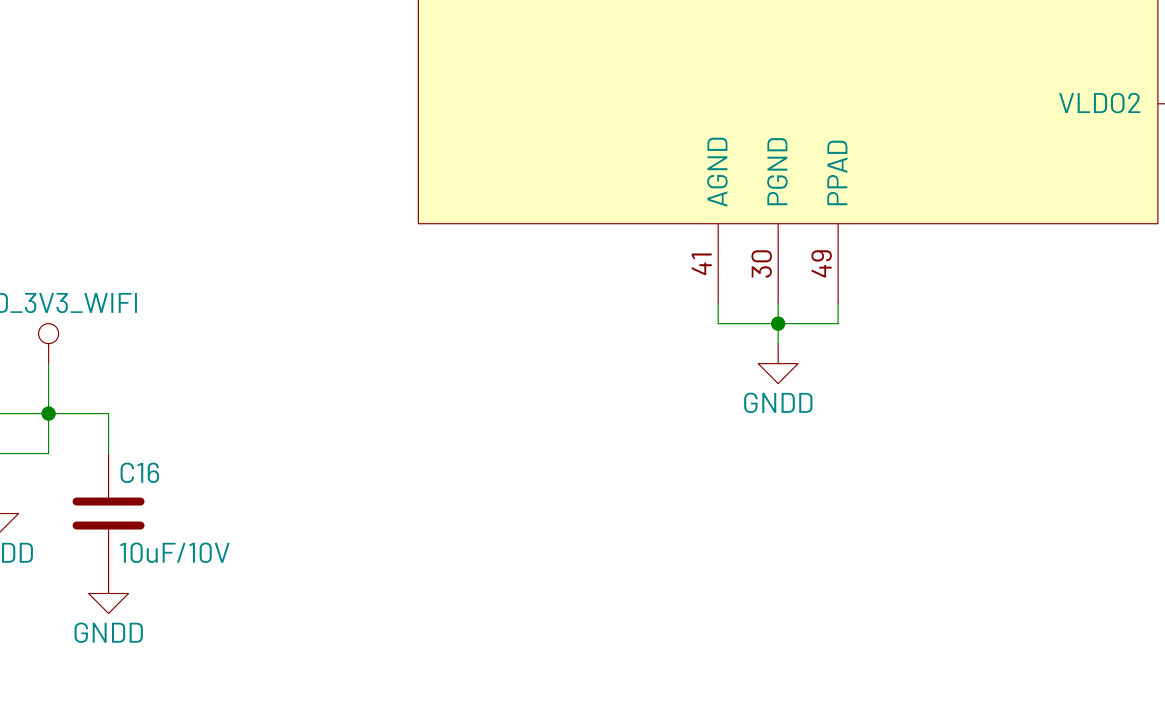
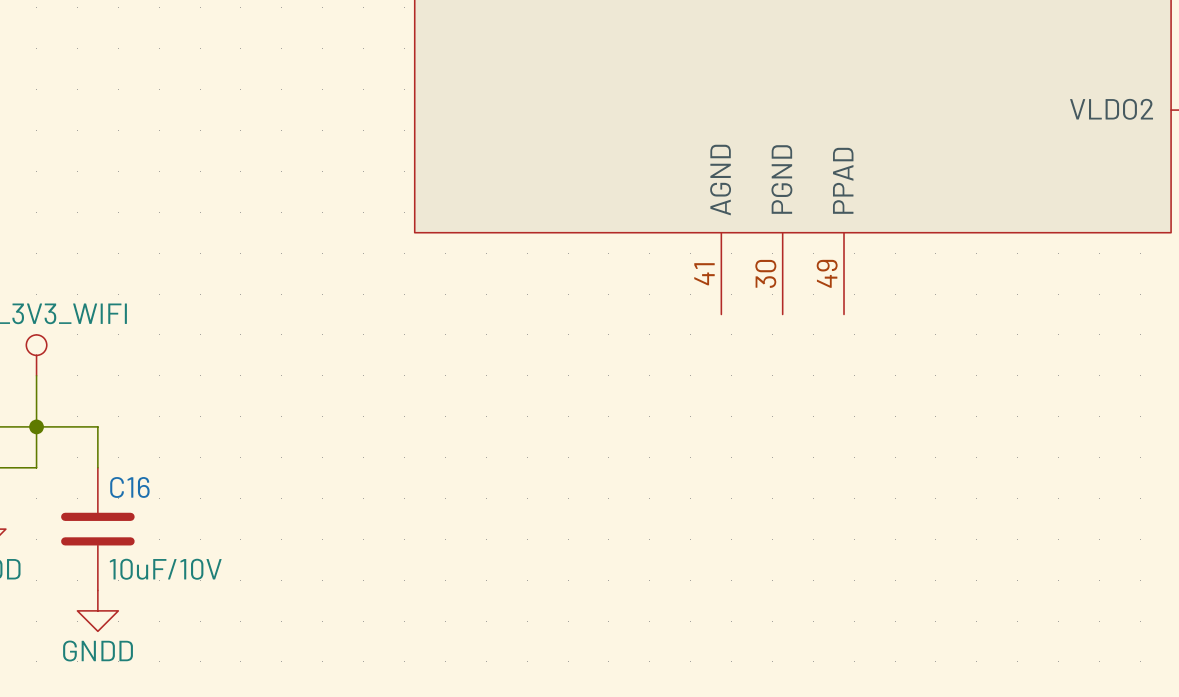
wire: (718, 303) (718, 323) (838, 323) (838, 303) -> none
wire: (778, 303) (778, 343) -> none
junction: (778, 323) -> none
power symbol: GNDD (778, 363) -> none

